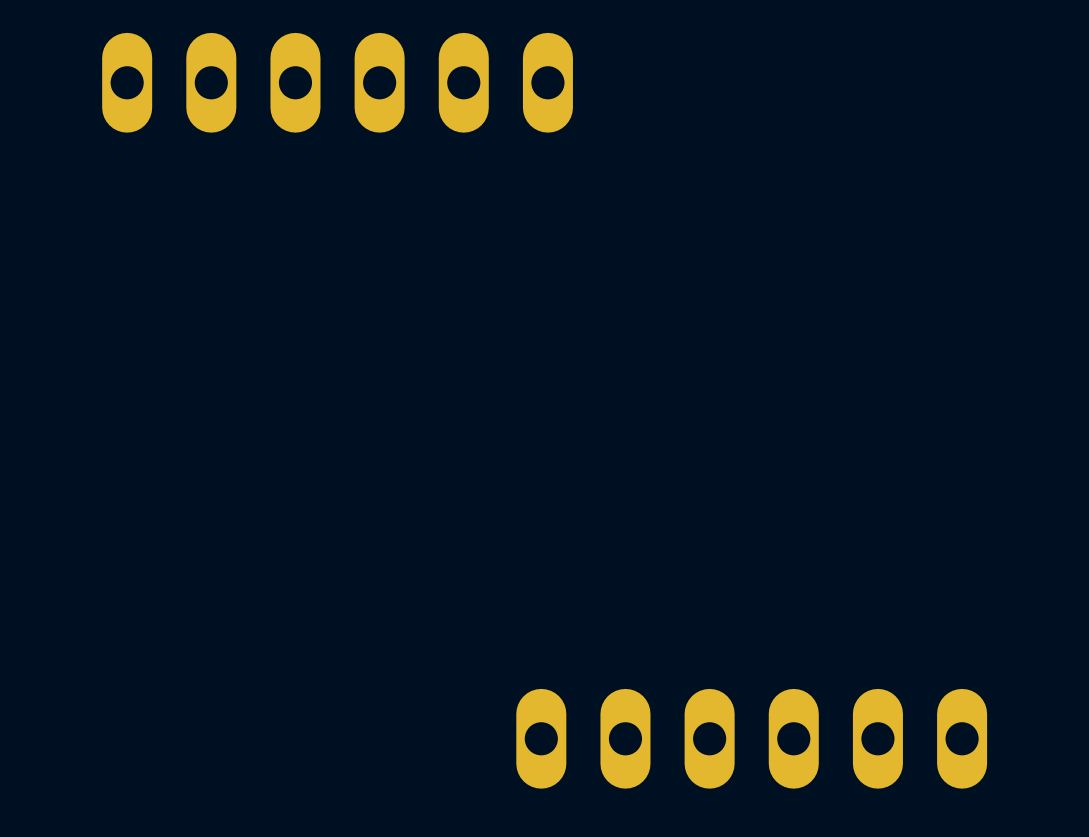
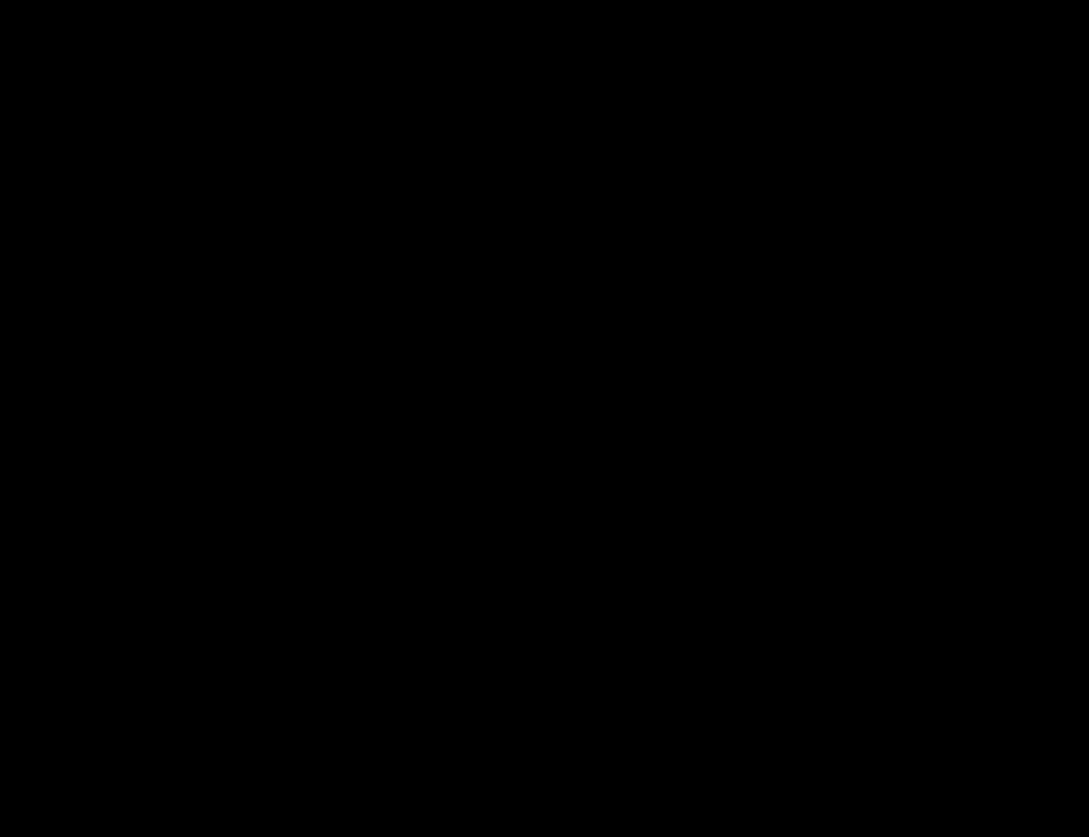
part: (337, 82) -> none
part: (751, 738) -> none

